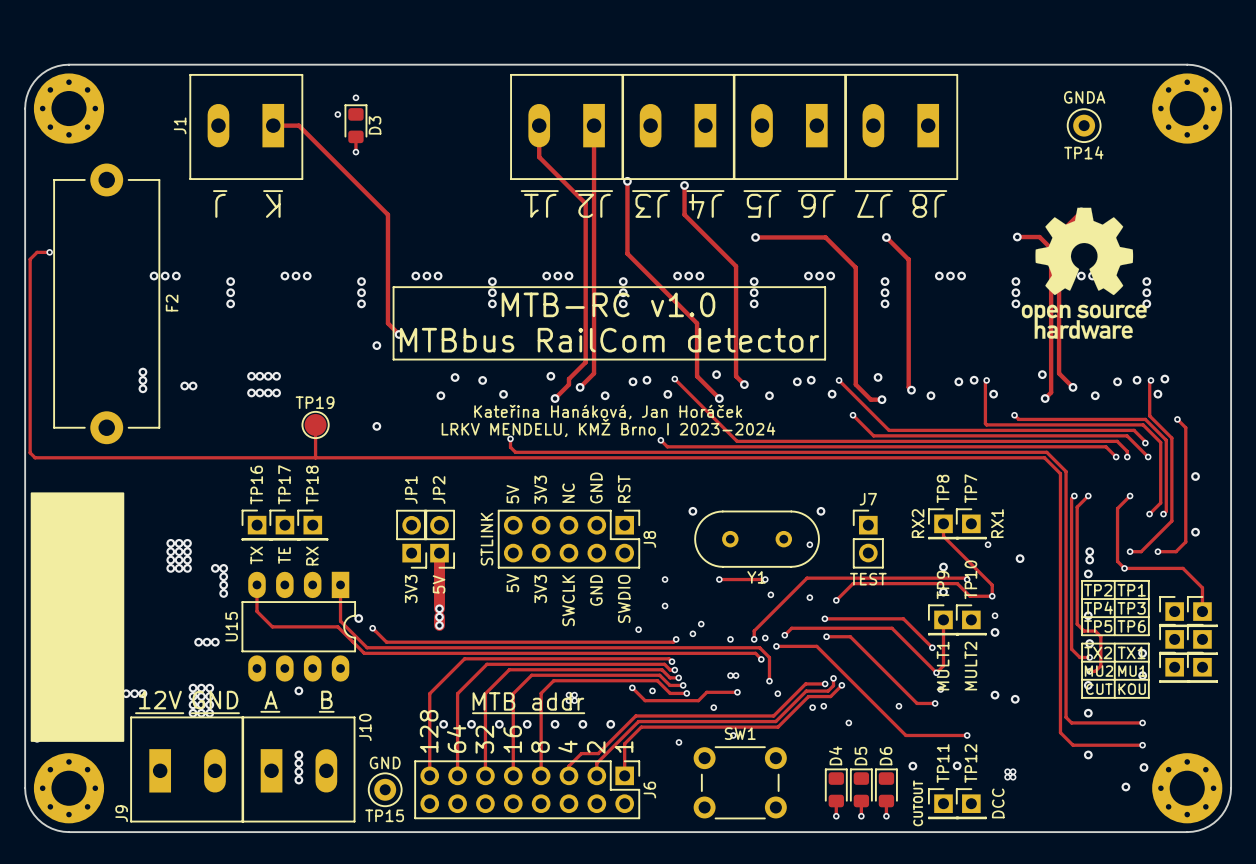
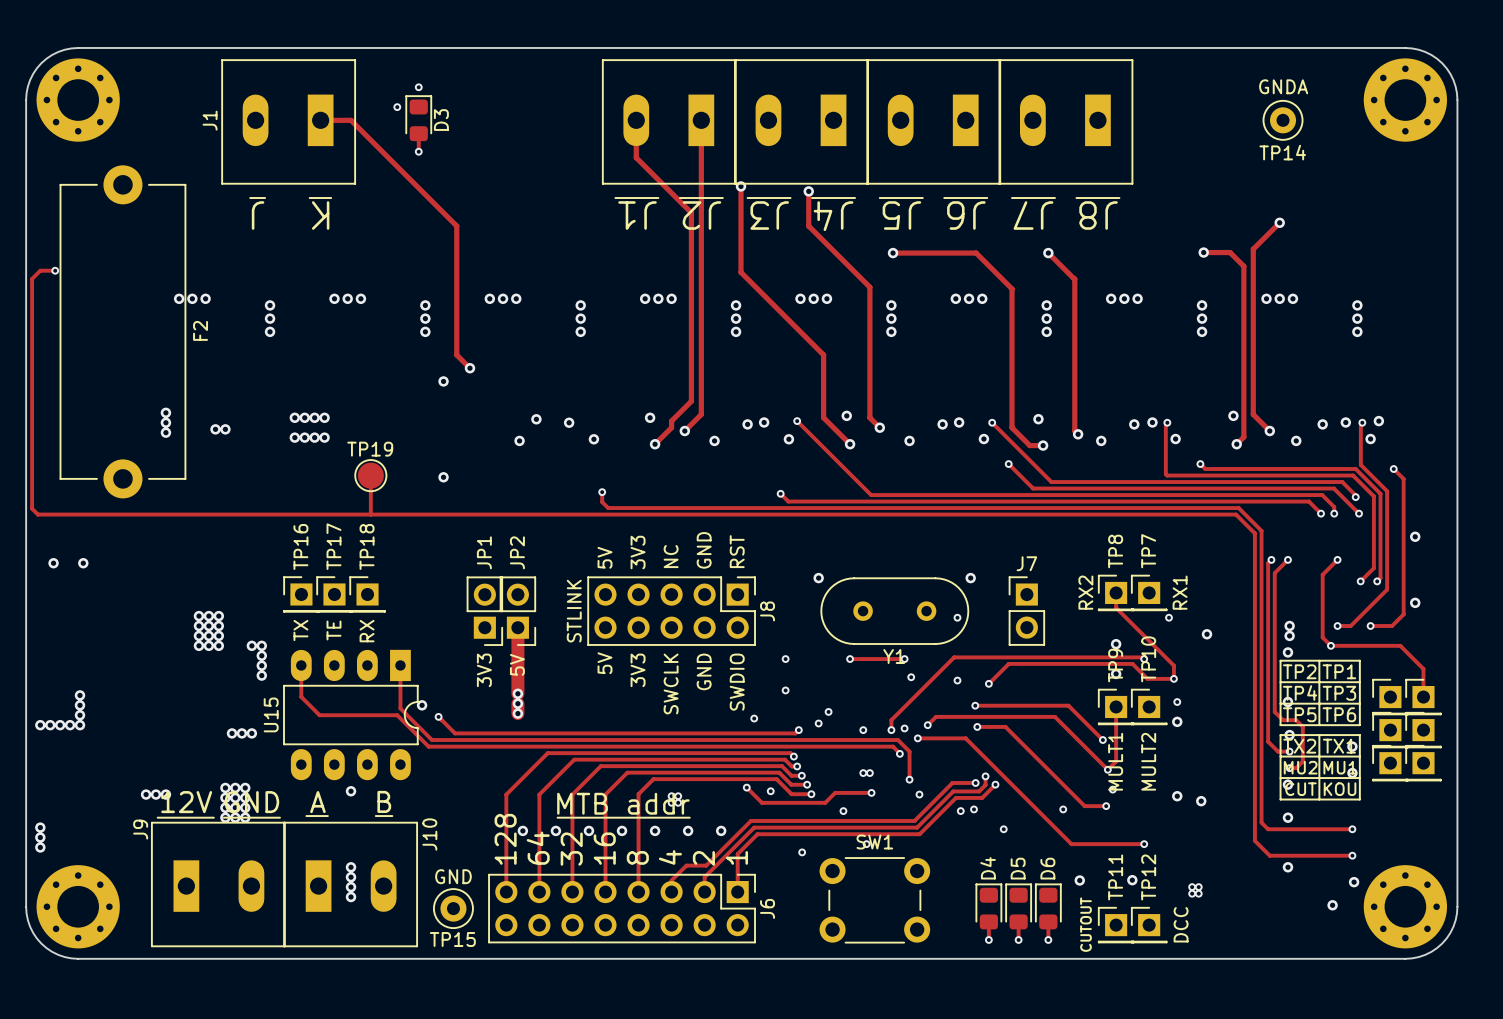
drawing: [1021, 207, 1147, 339] -> none
line: (393, 287) (393, 359) (825, 359) (825, 287) (393, 287) -> none
text: MTB-RC v1.0 (608, 304) -> none
text: MTBbus RailCom detector (609, 340) -> none
text: Kateřina Hanáková, Jan Horáček (608, 412) -> none
text: LRKV MENDELU, KMŽ Brno I 2023-2024 (608, 427) -> none
drawing: [30, 492, 125, 742] -> none
text: TEST (868, 579) -> none
J9 name position: J9 (121, 813) -> J9 (140, 829)

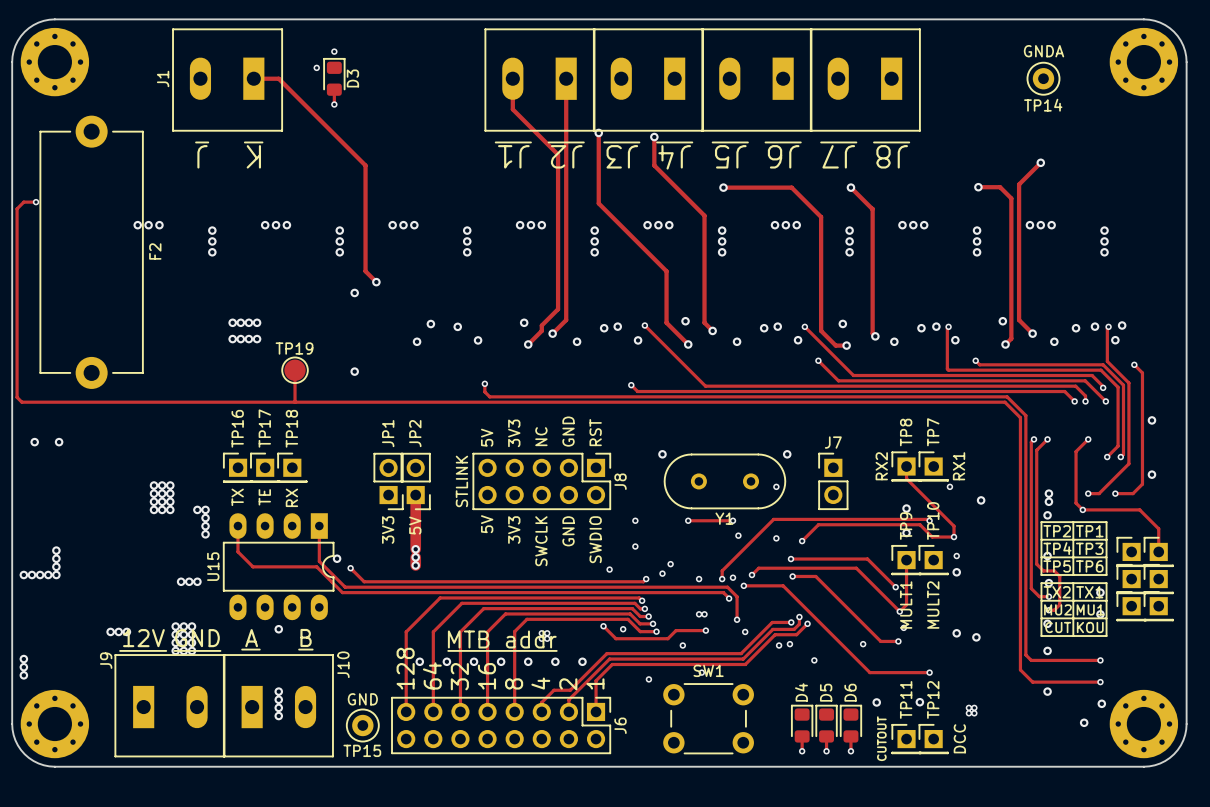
via: (165, 412) -> none
via: (165, 422) -> none
via: (215, 429) -> none
via: (225, 429) -> none
via: (165, 432) -> none

